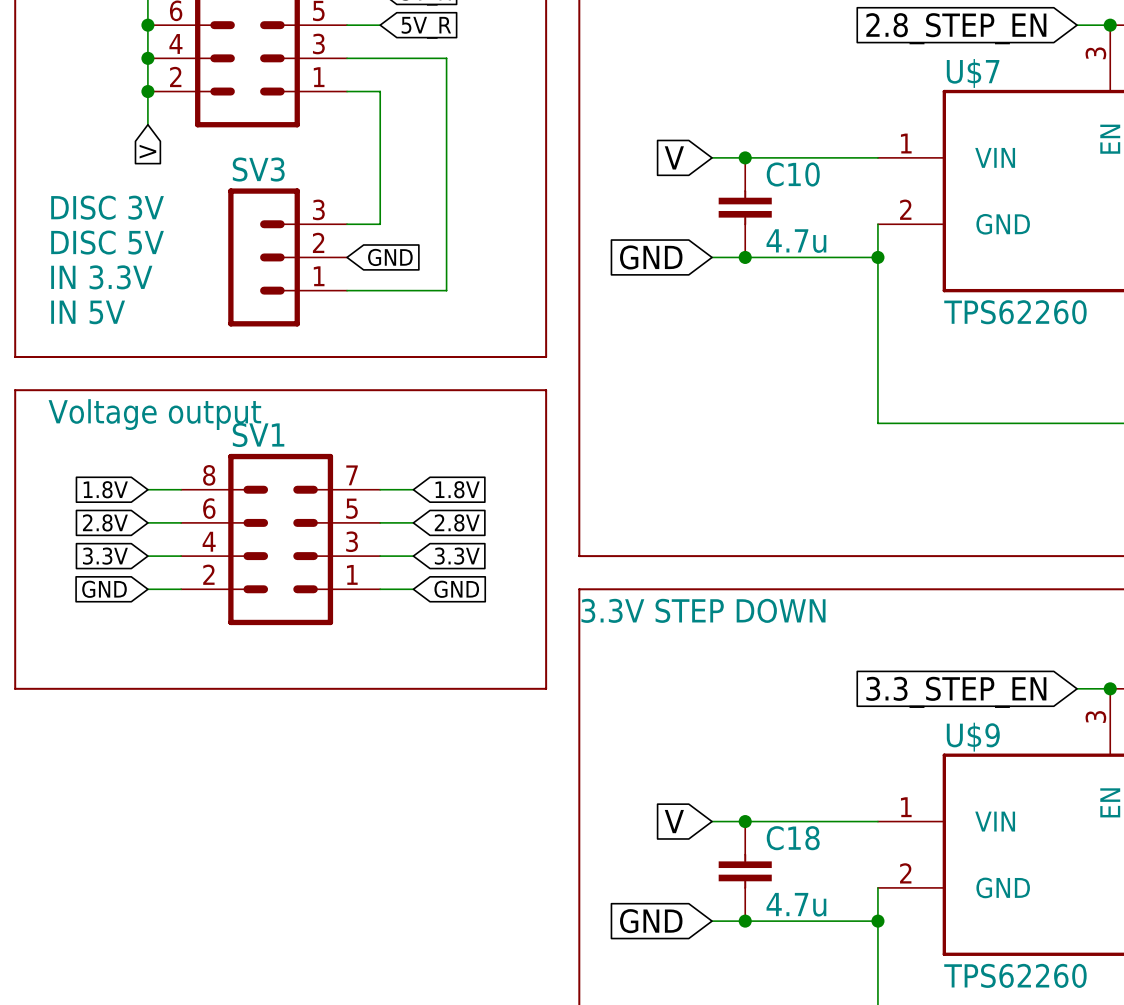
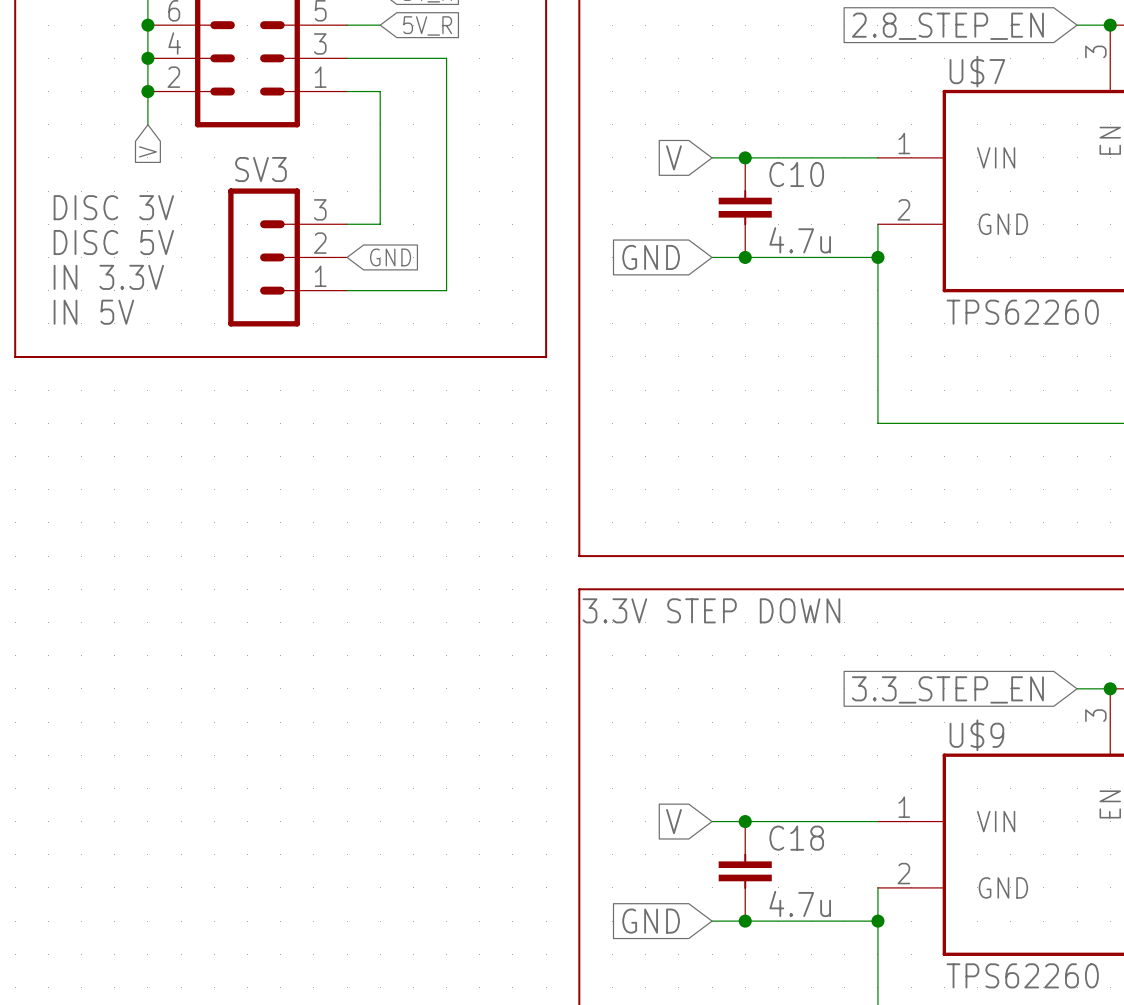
line: (15, 390) (546, 390) (546, 688) (15, 688) (15, 390) -> none
text: Voltage output (154, 414) -> none
global label: 1.8V (105, 489) -> none
wire: (147, 489) (181, 489) -> none
wire: (380, 489) (413, 489) -> none
global label: 1.8V (457, 489) -> none
global label: 2.8V (105, 522) -> none
wire: (147, 522) (181, 522) -> none
wire: (380, 522) (413, 522) -> none
global label: 2.8V (457, 522) -> none
SV1: (280, 539) -> none
global label: 3.3V (105, 556) -> none
wire: (147, 556) (181, 556) -> none
wire: (380, 556) (413, 556) -> none
global label: 3.3V (457, 556) -> none
global label: GND (104, 589) -> none
wire: (147, 589) (181, 589) -> none
wire: (380, 589) (413, 589) -> none
global label: GND (456, 589) -> none

